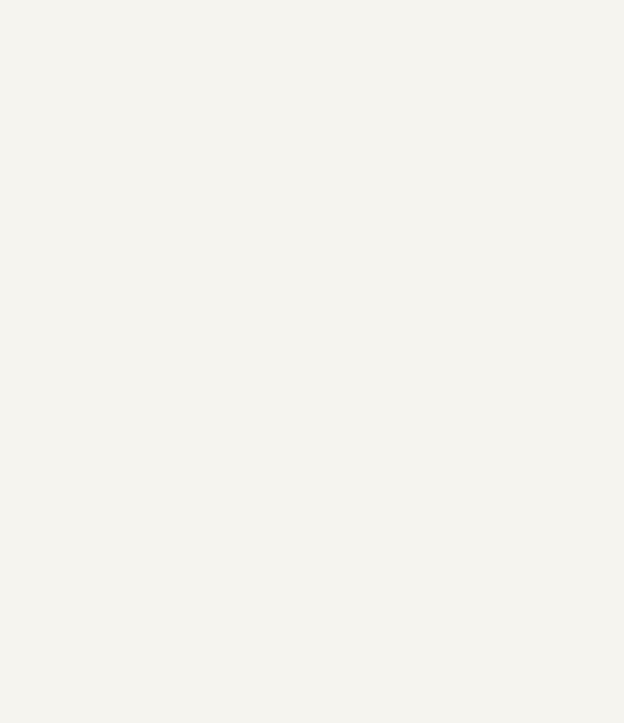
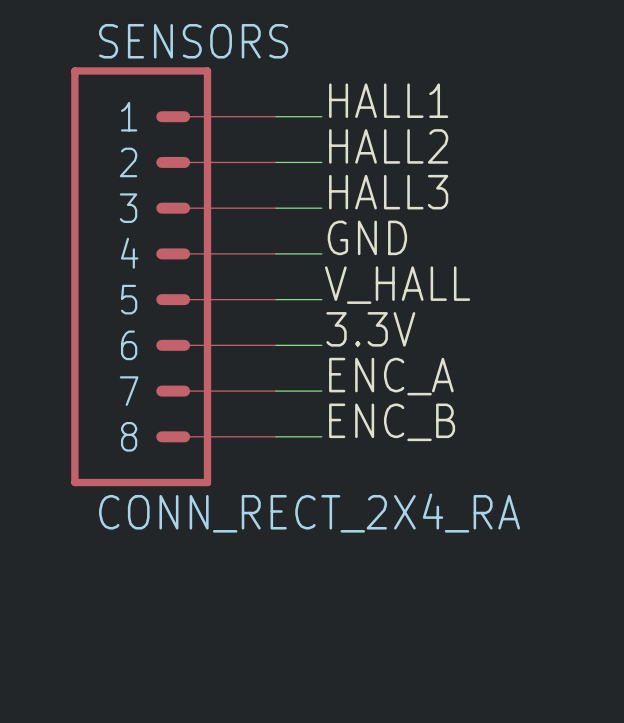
label: none -> HALL1 (388, 100)
wire: none -> (276, 116) (321, 116)
label: none -> HALL2 (388, 146)
wire: none -> (276, 162) (321, 162)
label: none -> HALL3 (388, 192)
wire: none -> (276, 208) (321, 208)
label: none -> GND (367, 237)
wire: none -> (276, 253) (321, 253)
SENSORS: none -> CONN_RECT_2X4_RA (173, 276)
label: none -> V_HALL (397, 285)
wire: none -> (276, 299) (321, 299)
label: none -> 3.3V (370, 329)
wire: none -> (276, 345) (321, 345)
label: none -> ENC_A (391, 376)
wire: none -> (276, 391) (321, 391)
label: none -> ENC_B (392, 422)
wire: none -> (276, 436) (321, 436)

